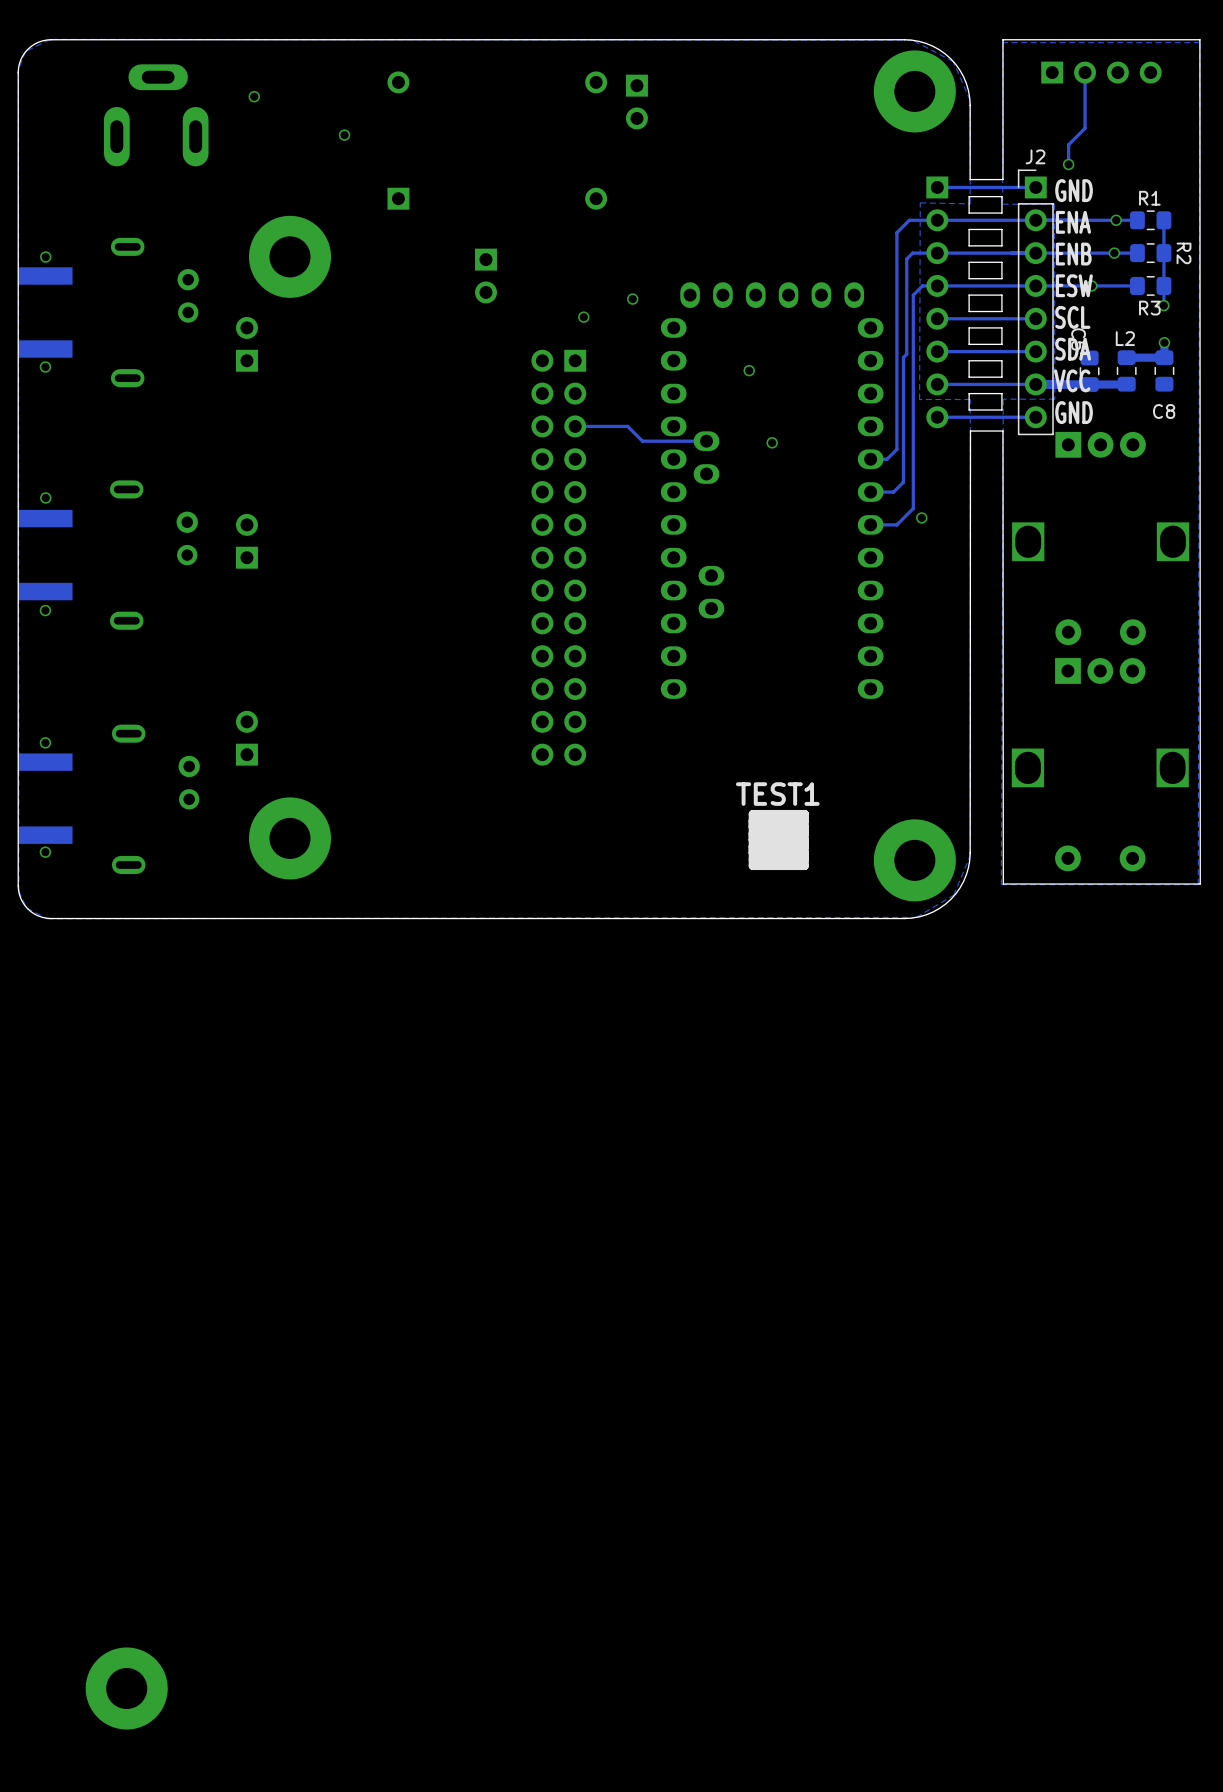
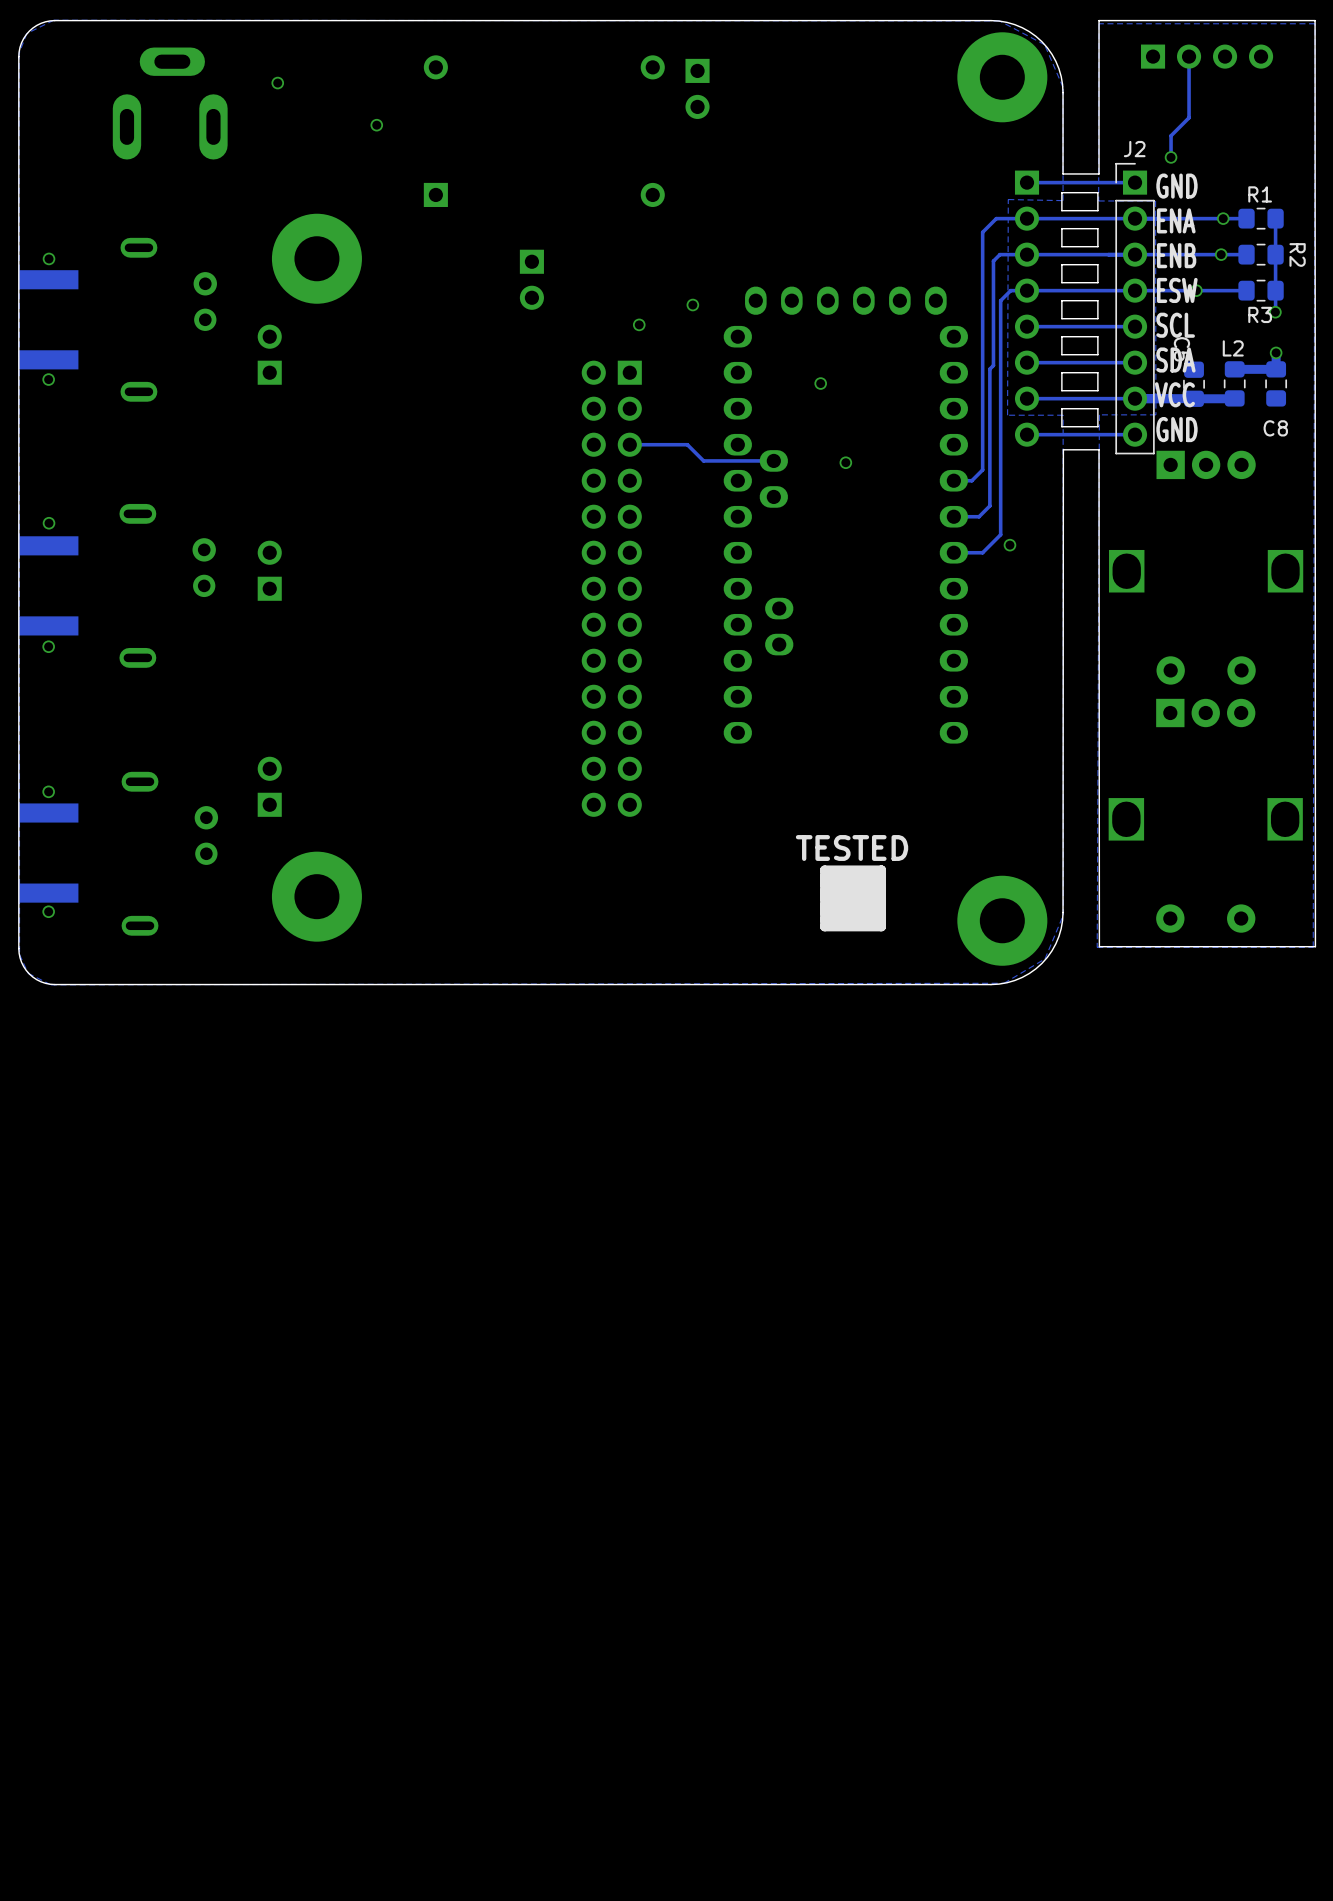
TEST1 name: TEST1 (777, 794) -> TESTED (852, 847)
part: (126, 1688) -> none

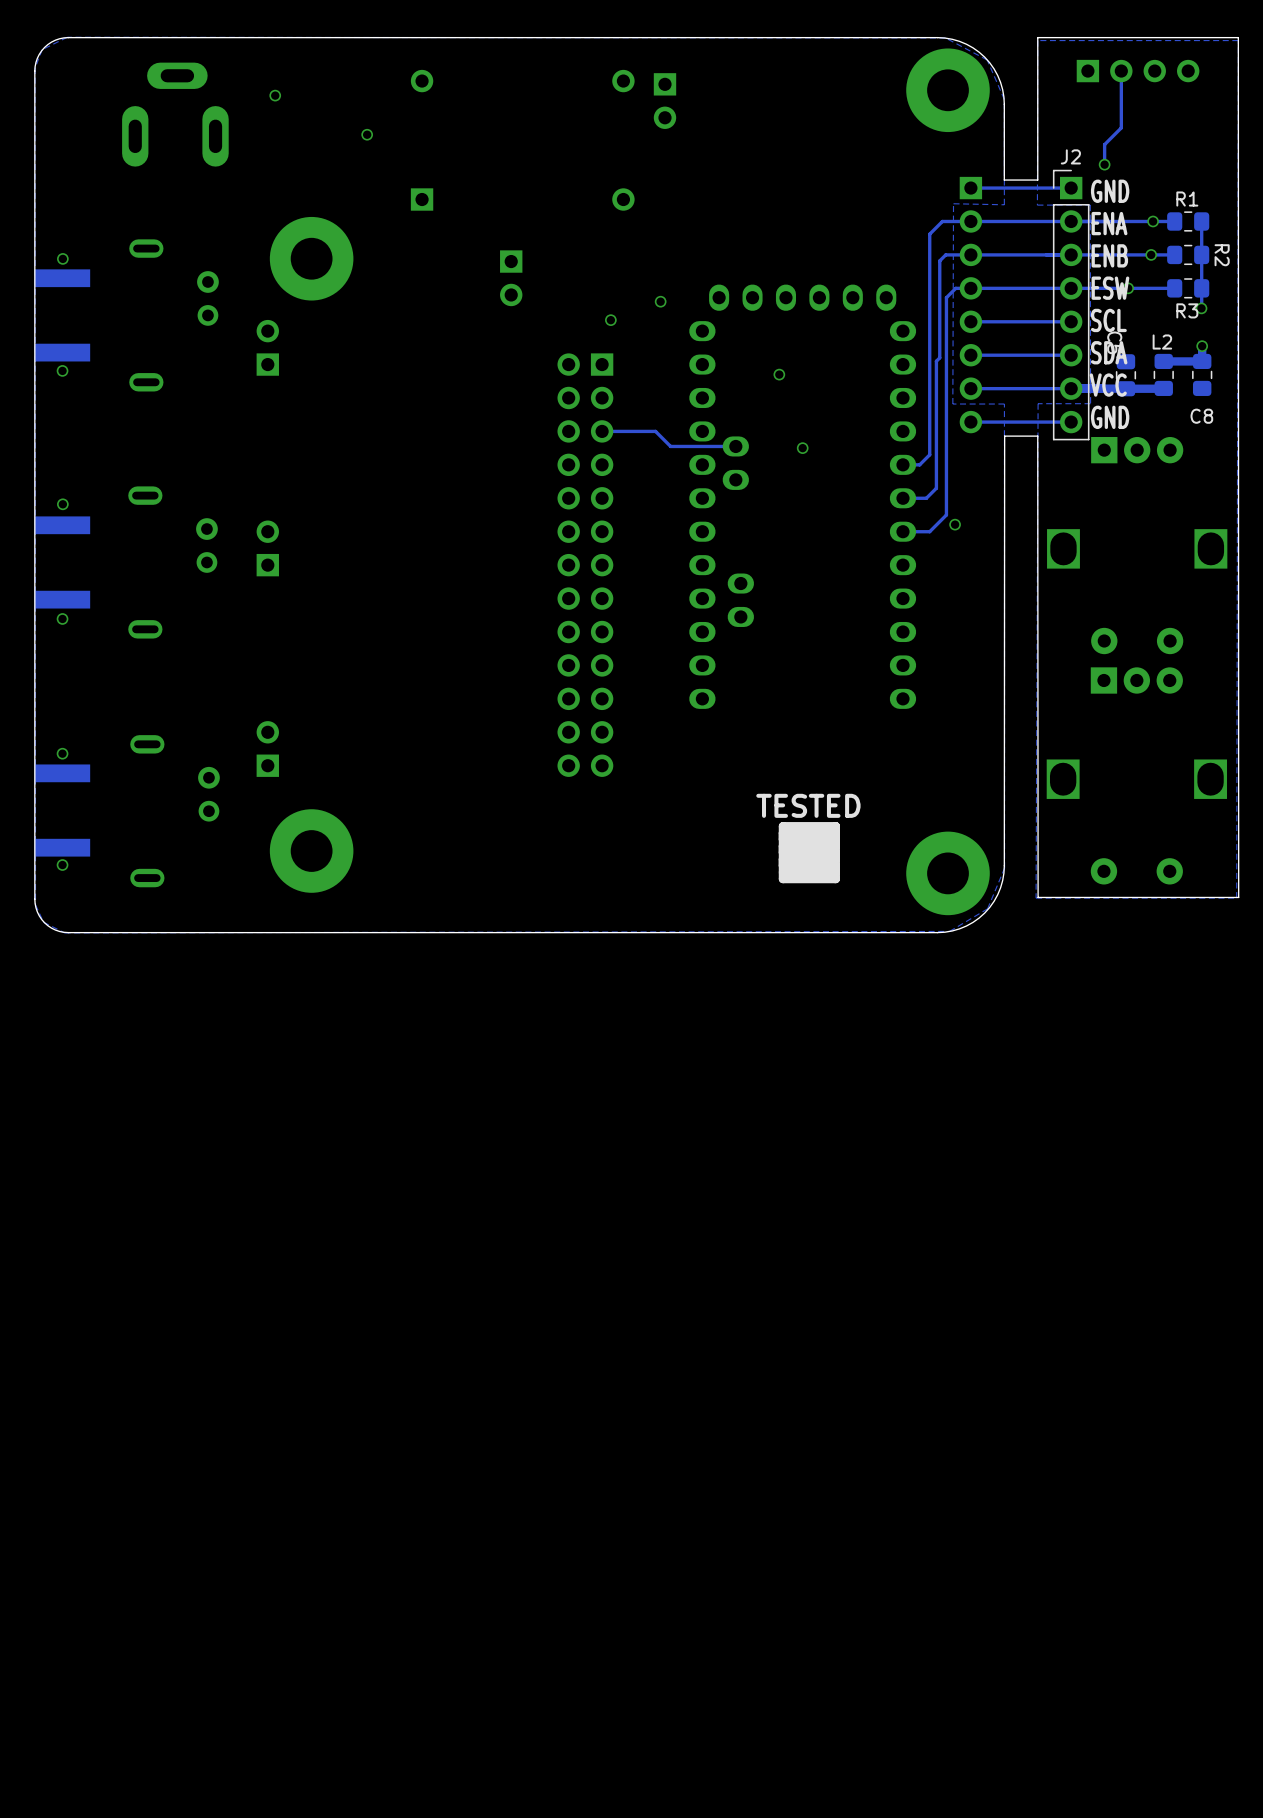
board edge: (1097, 192) (1097, 210) (1061, 210) (1061, 192) (1097, 192) -> none
board edge: (1097, 228) (1097, 246) (1061, 246) (1061, 228) (1097, 228) -> none
board edge: (1097, 264) (1097, 282) (1061, 282) (1061, 264) (1097, 264) -> none
board edge: (1097, 300) (1097, 318) (1061, 318) (1061, 300) (1097, 300) -> none
board edge: (1097, 336) (1097, 354) (1061, 354) (1061, 336) (1097, 336) -> none
board edge: (1097, 372) (1097, 390) (1061, 390) (1061, 372) (1097, 372) -> none
board edge: (1097, 408) (1097, 426) (1061, 426) (1061, 408) (1097, 408) -> none

